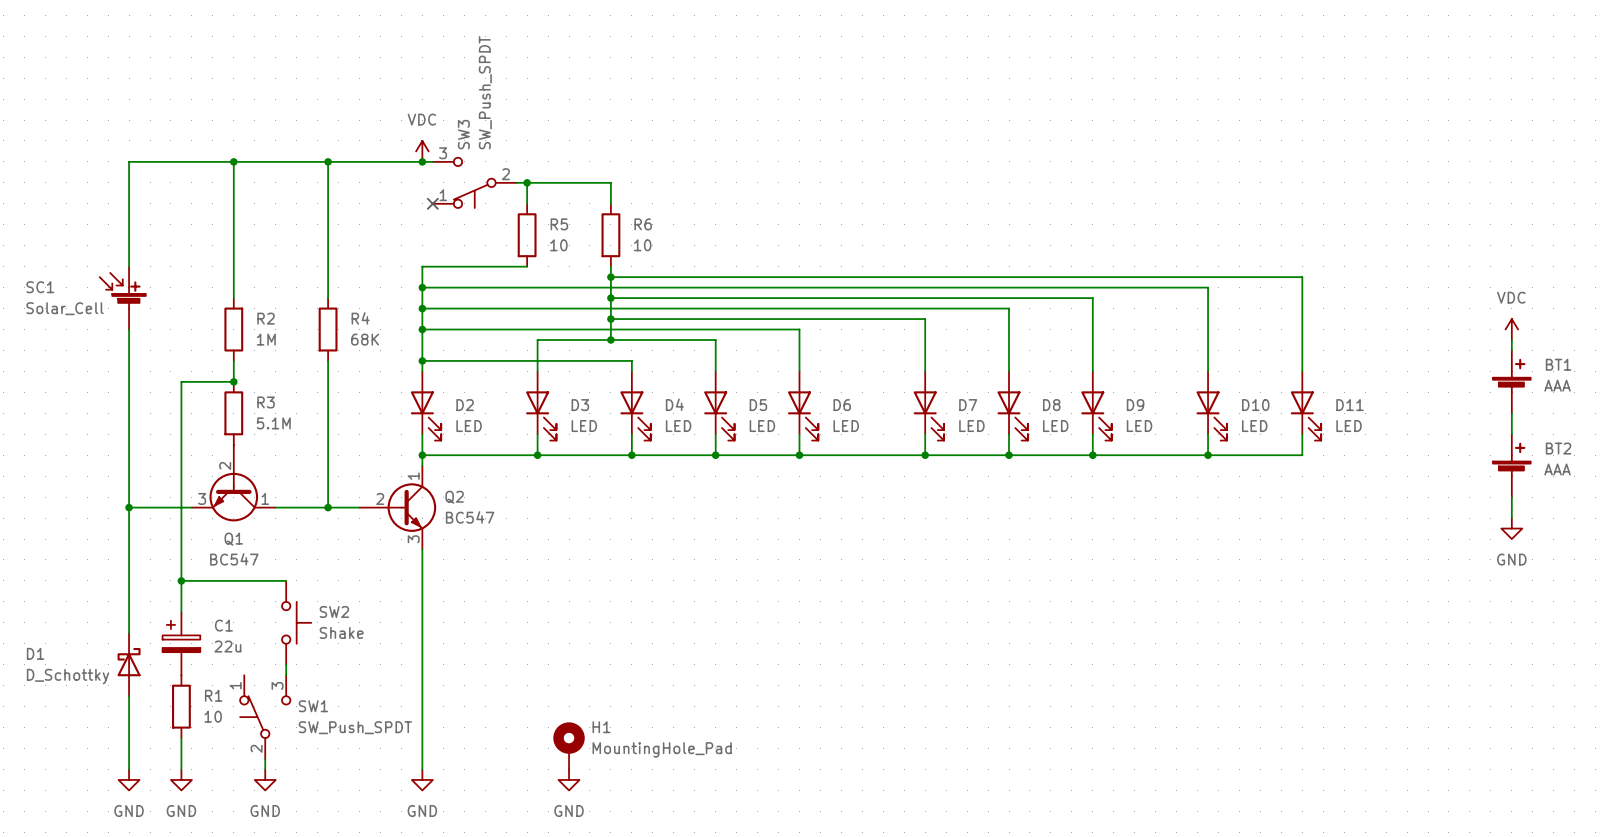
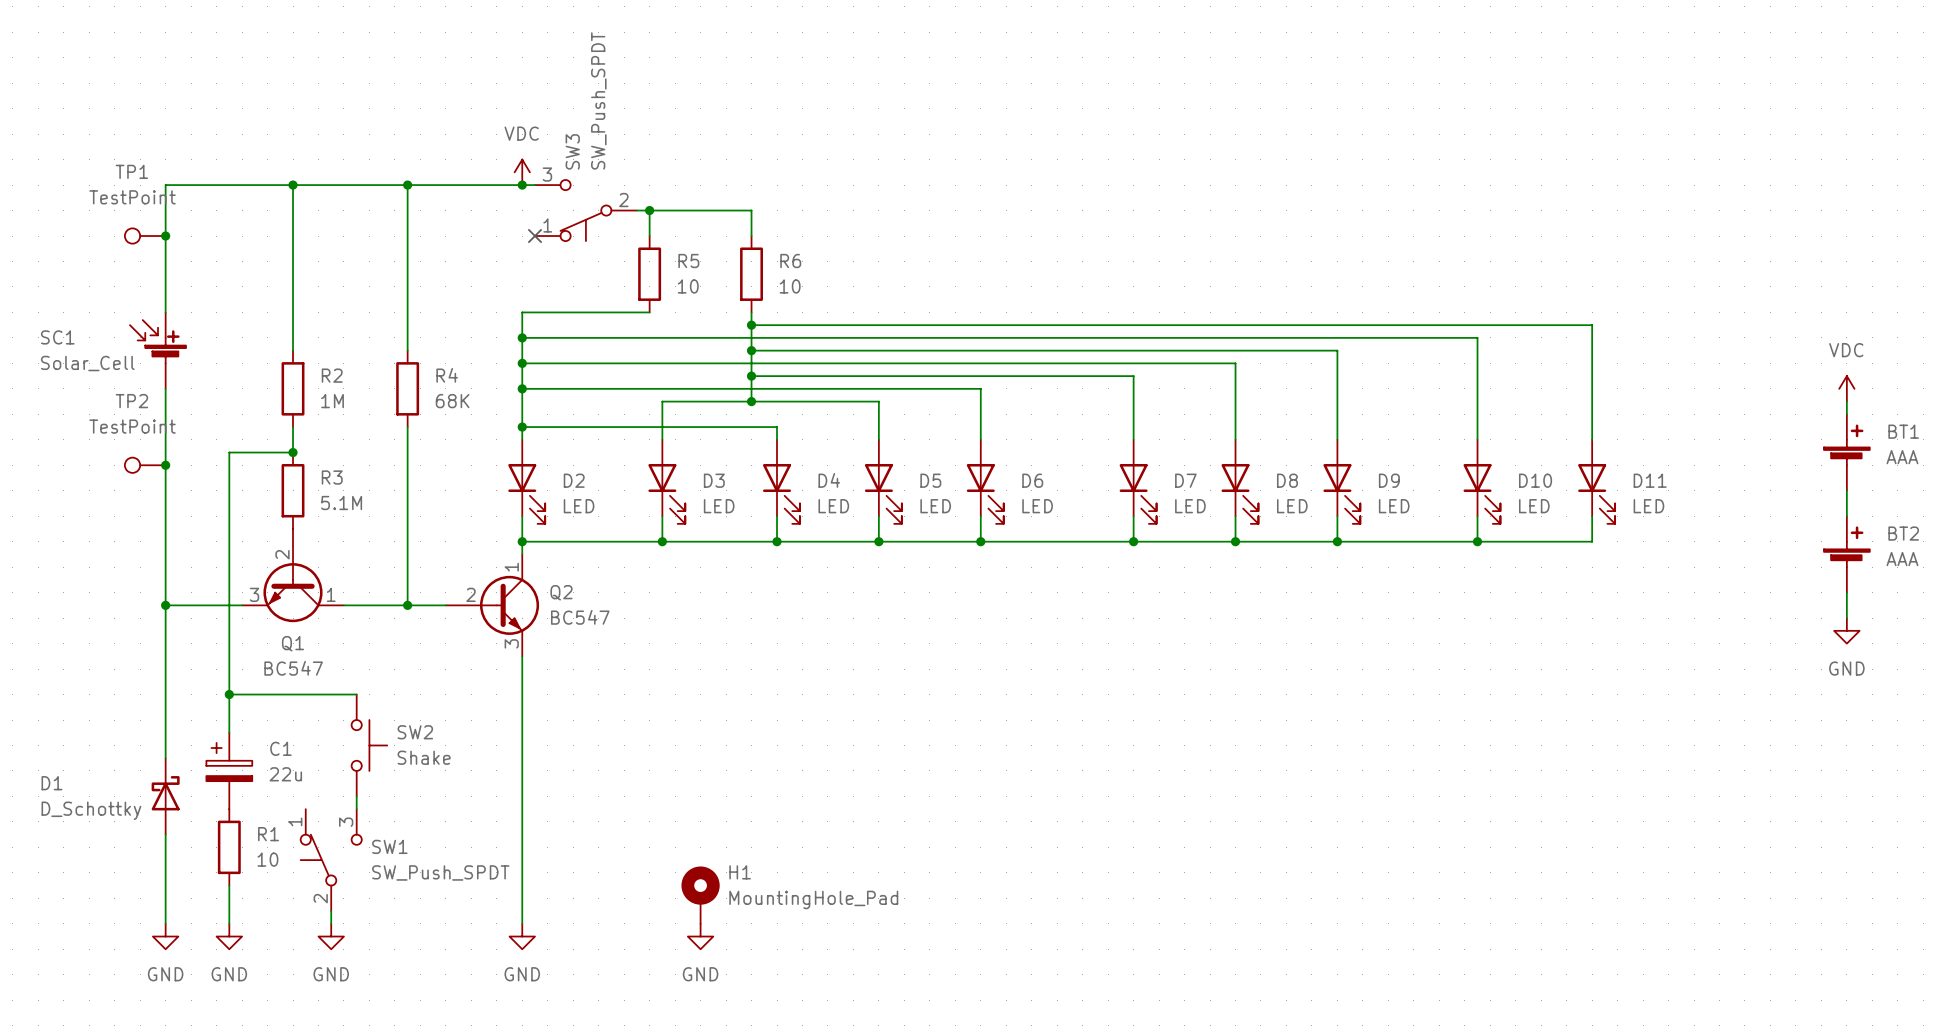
TP1: none -> TestPoint (145, 236)
junction: none -> (165, 236)
TP2: none -> TestPoint (145, 465)
junction: none -> (165, 465)

